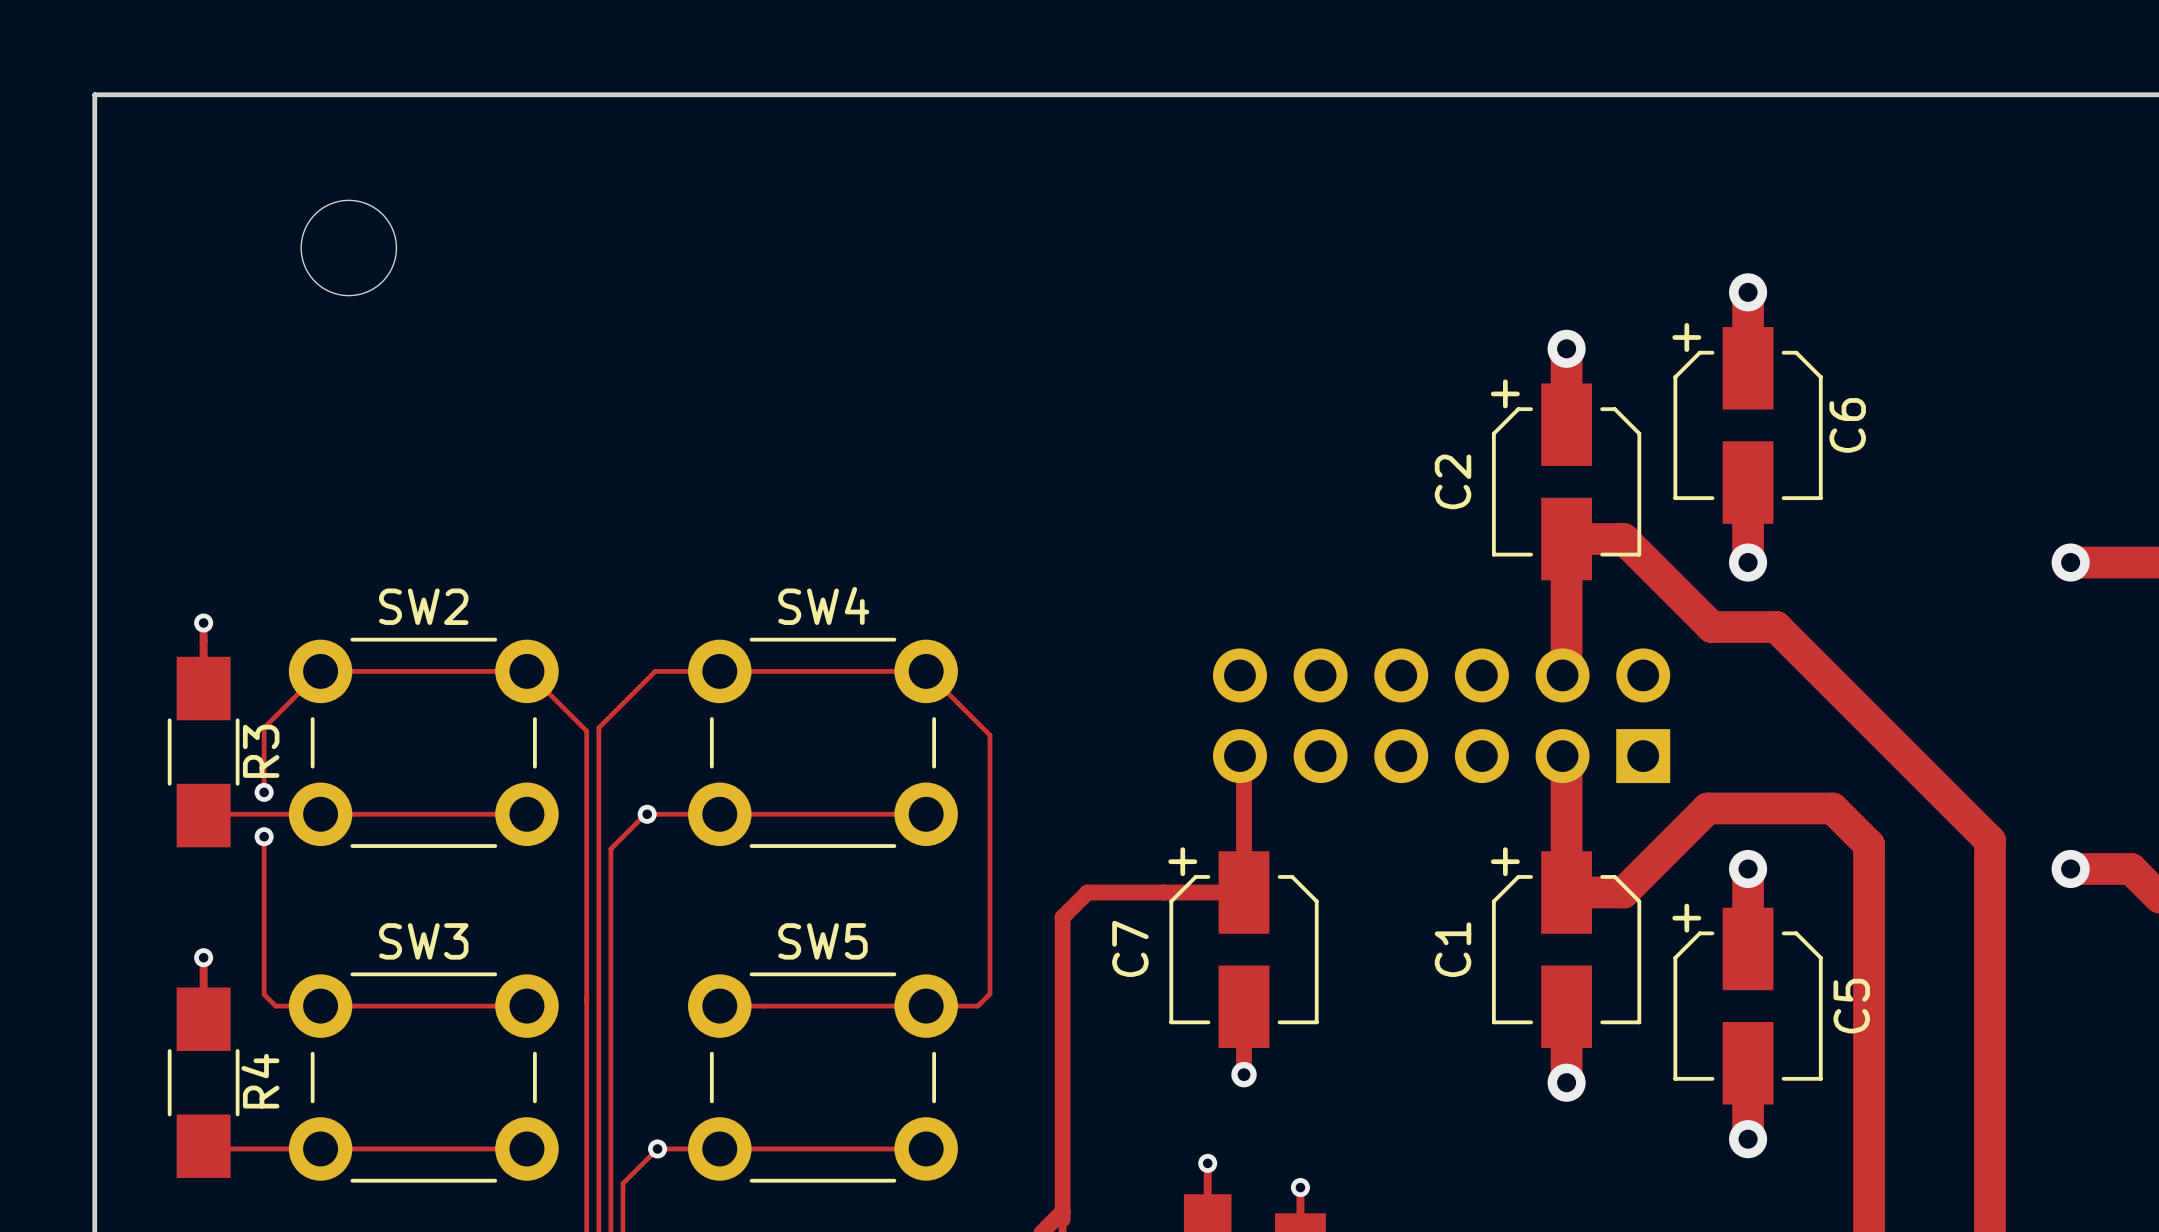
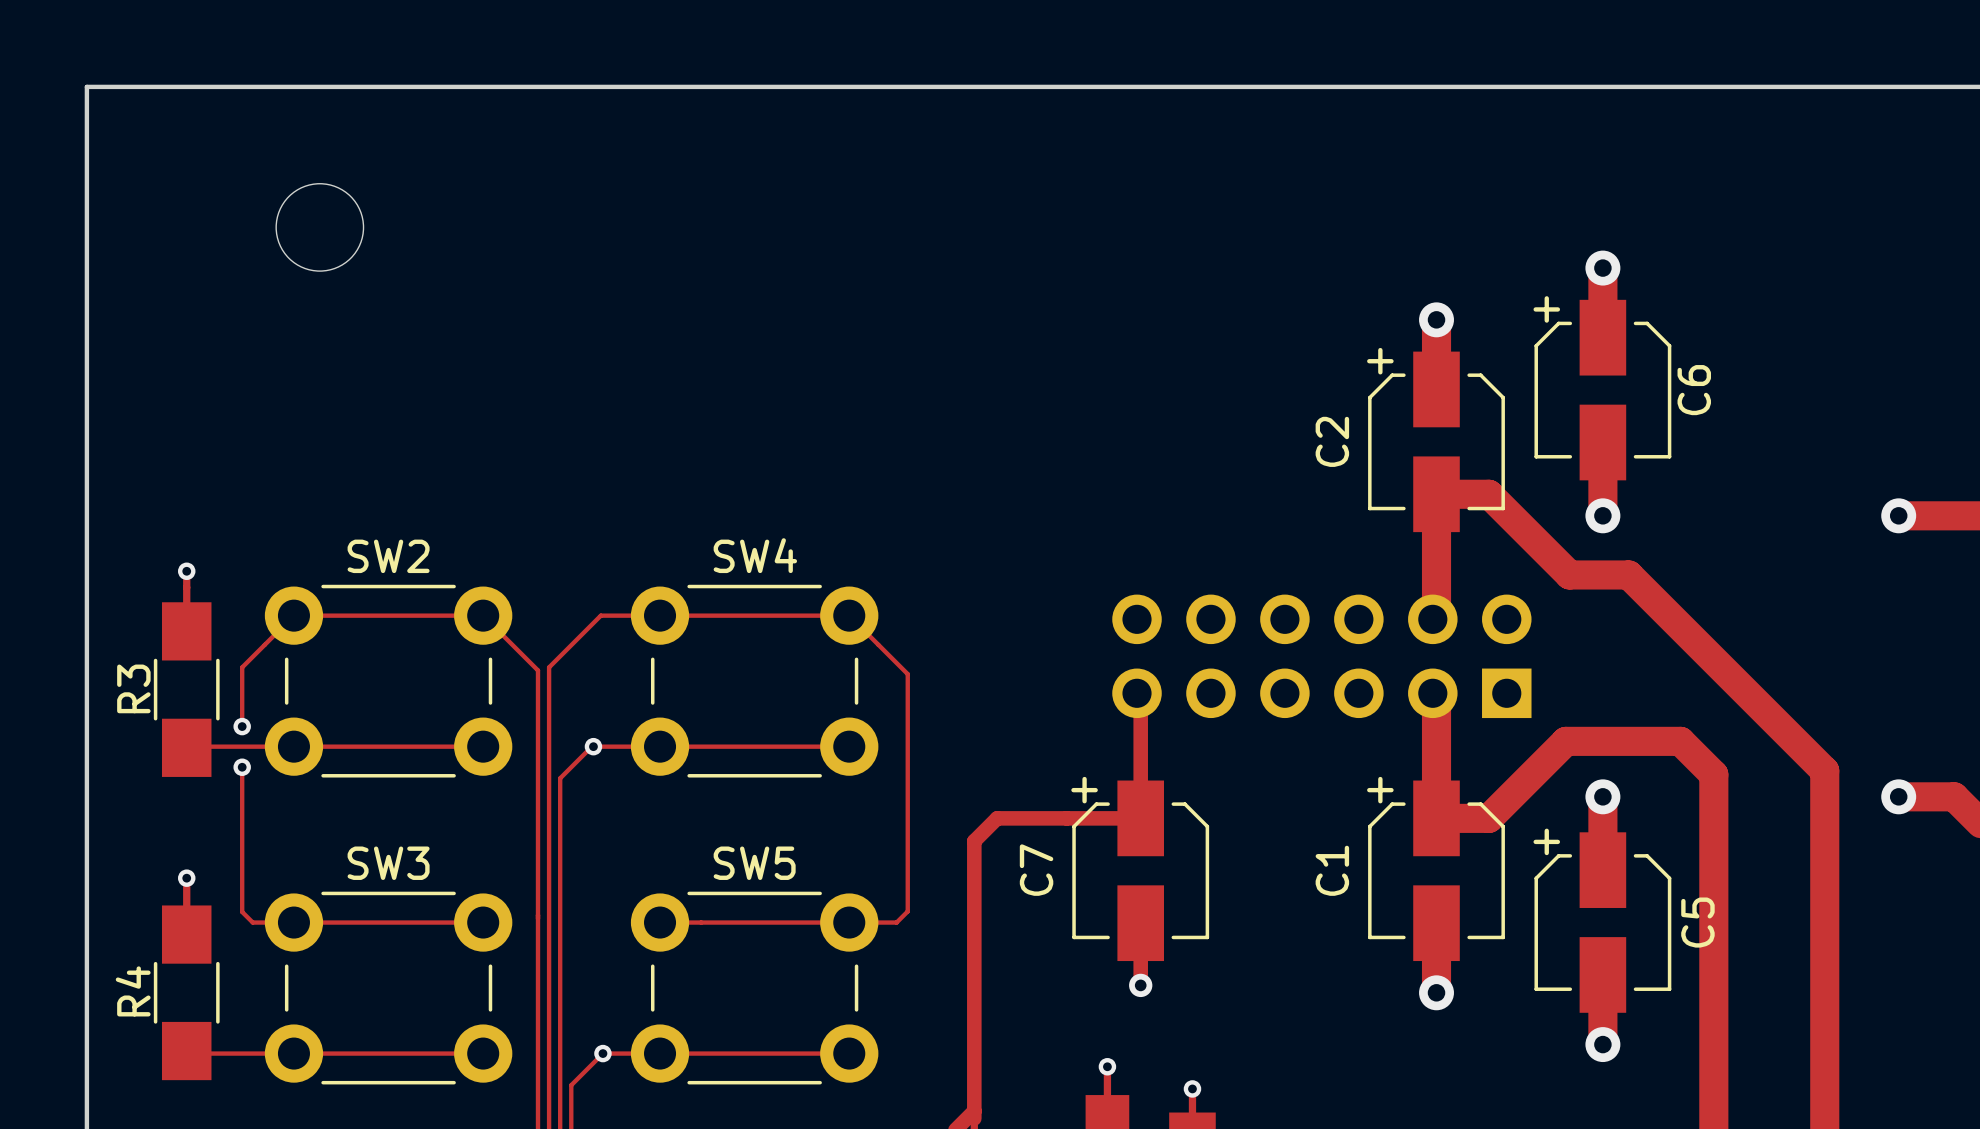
R3 name position: R3 (261, 751) -> R3 (133, 688)
R4 name position: R4 (260, 1081) -> R4 (133, 991)

